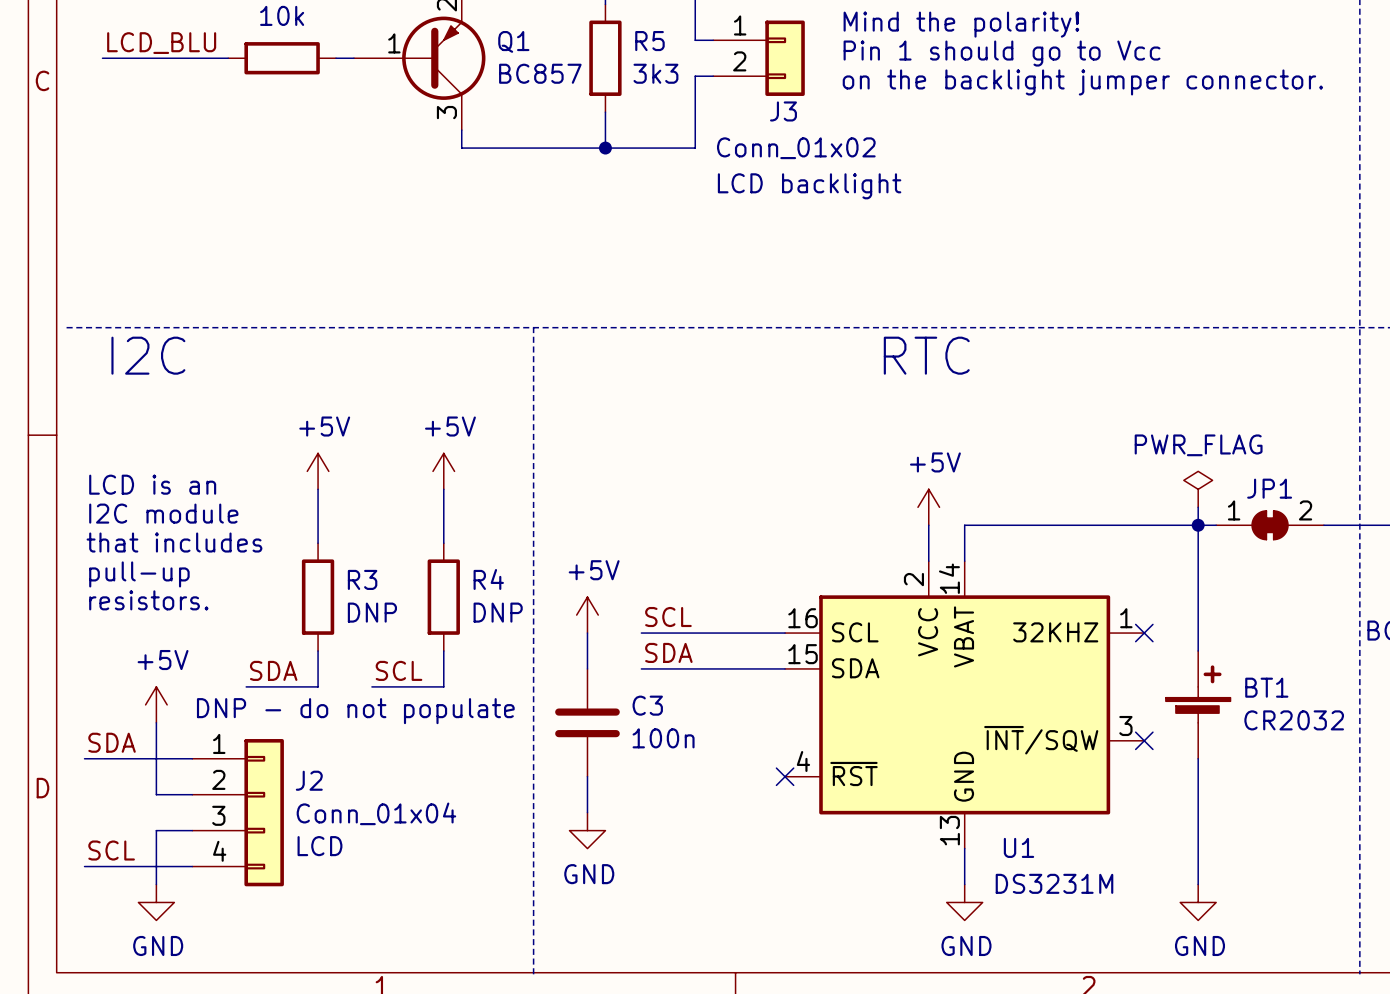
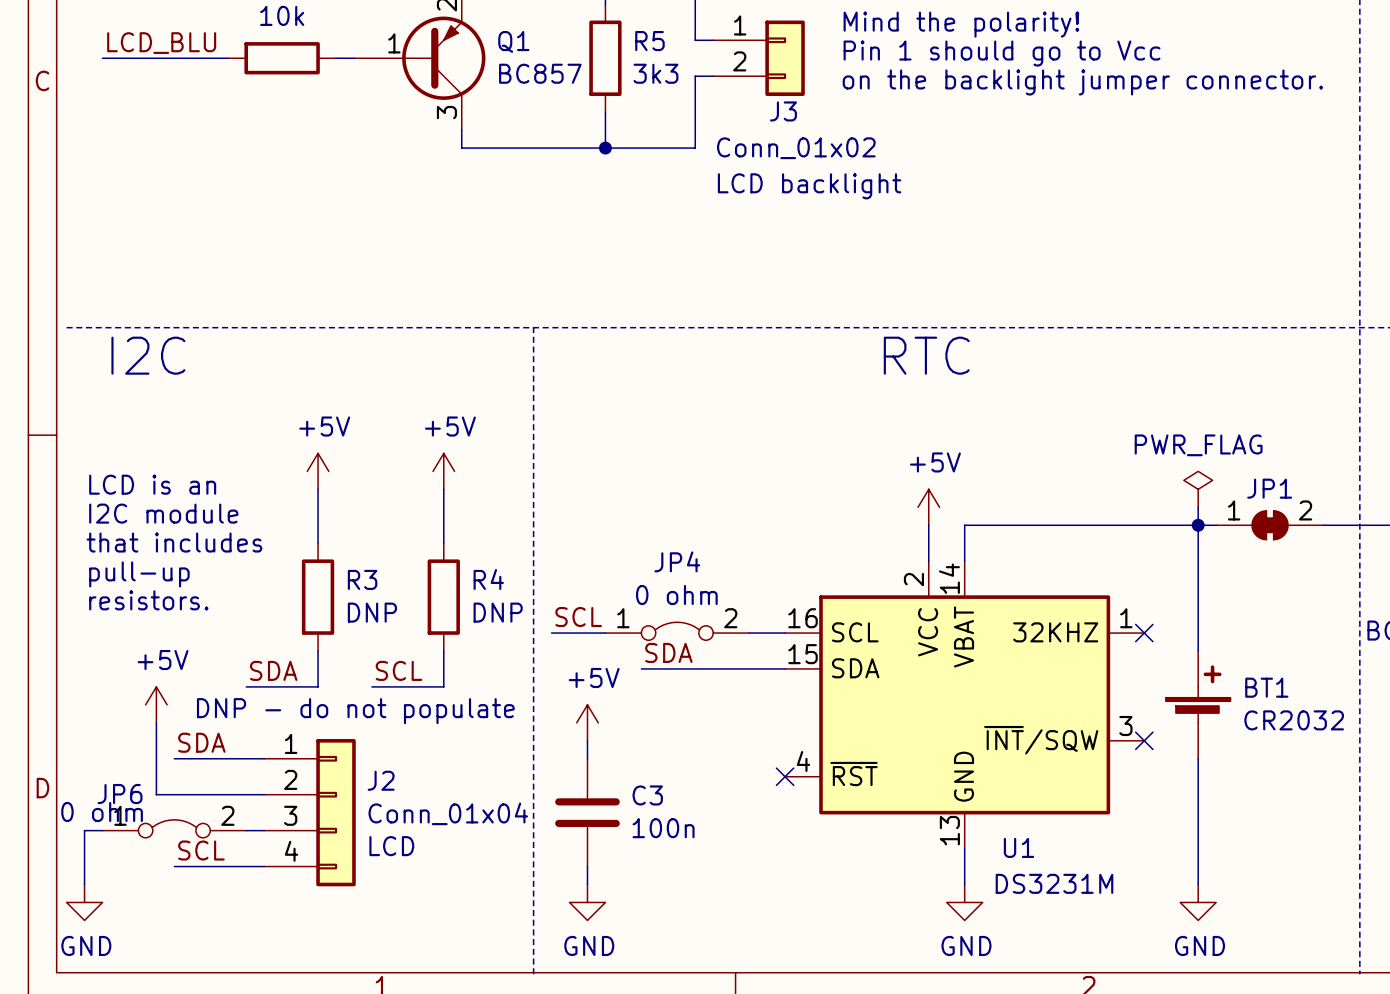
power symbol position: +5V (587, 615) -> +5V (587, 722)
label position: SCL (668, 617) -> SCL (578, 617)
JP4: none -> 0 ohm (677, 631)
wire: none -> (551, 633) (605, 633)
wire: (587, 633) (587, 668) -> none
wire: (641, 633) (749, 633) -> none
C3 position: (587, 722) -> (587, 812)
label position: SDA (112, 742) -> SDA (201, 742)
wire: (84, 758) (174, 758) -> none
J2 position: (238, 812) -> (309, 812)
JP6: none -> 0 ohm (174, 828)
wire: none -> (102, 830) (84, 830) (84, 884)
wire: (192, 830) (156, 830) (156, 884) -> none
power symbol position: GND (587, 830) -> GND (587, 902)
label position: SCL (111, 850) -> SCL (201, 850)
wire: (84, 866) (174, 866) -> none
wire: none -> (587, 866) (587, 884)
power symbol position: GND (156, 902) -> GND (84, 902)

